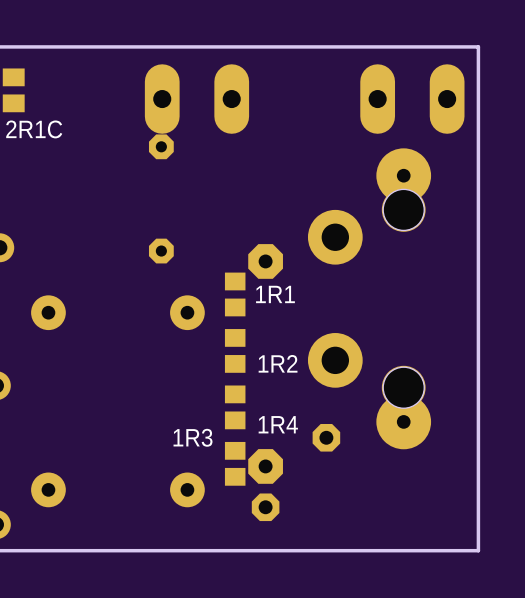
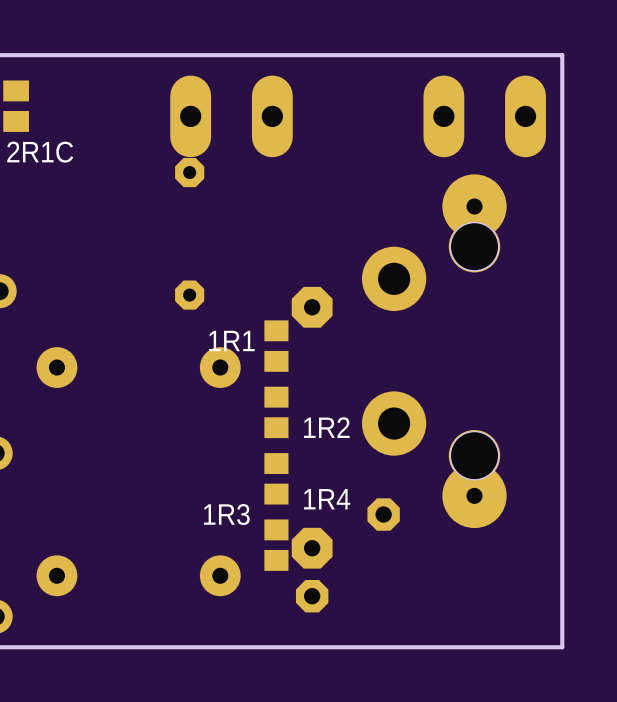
1R1 name position: 1R1 (275, 294) -> 1R1 (231, 340)

